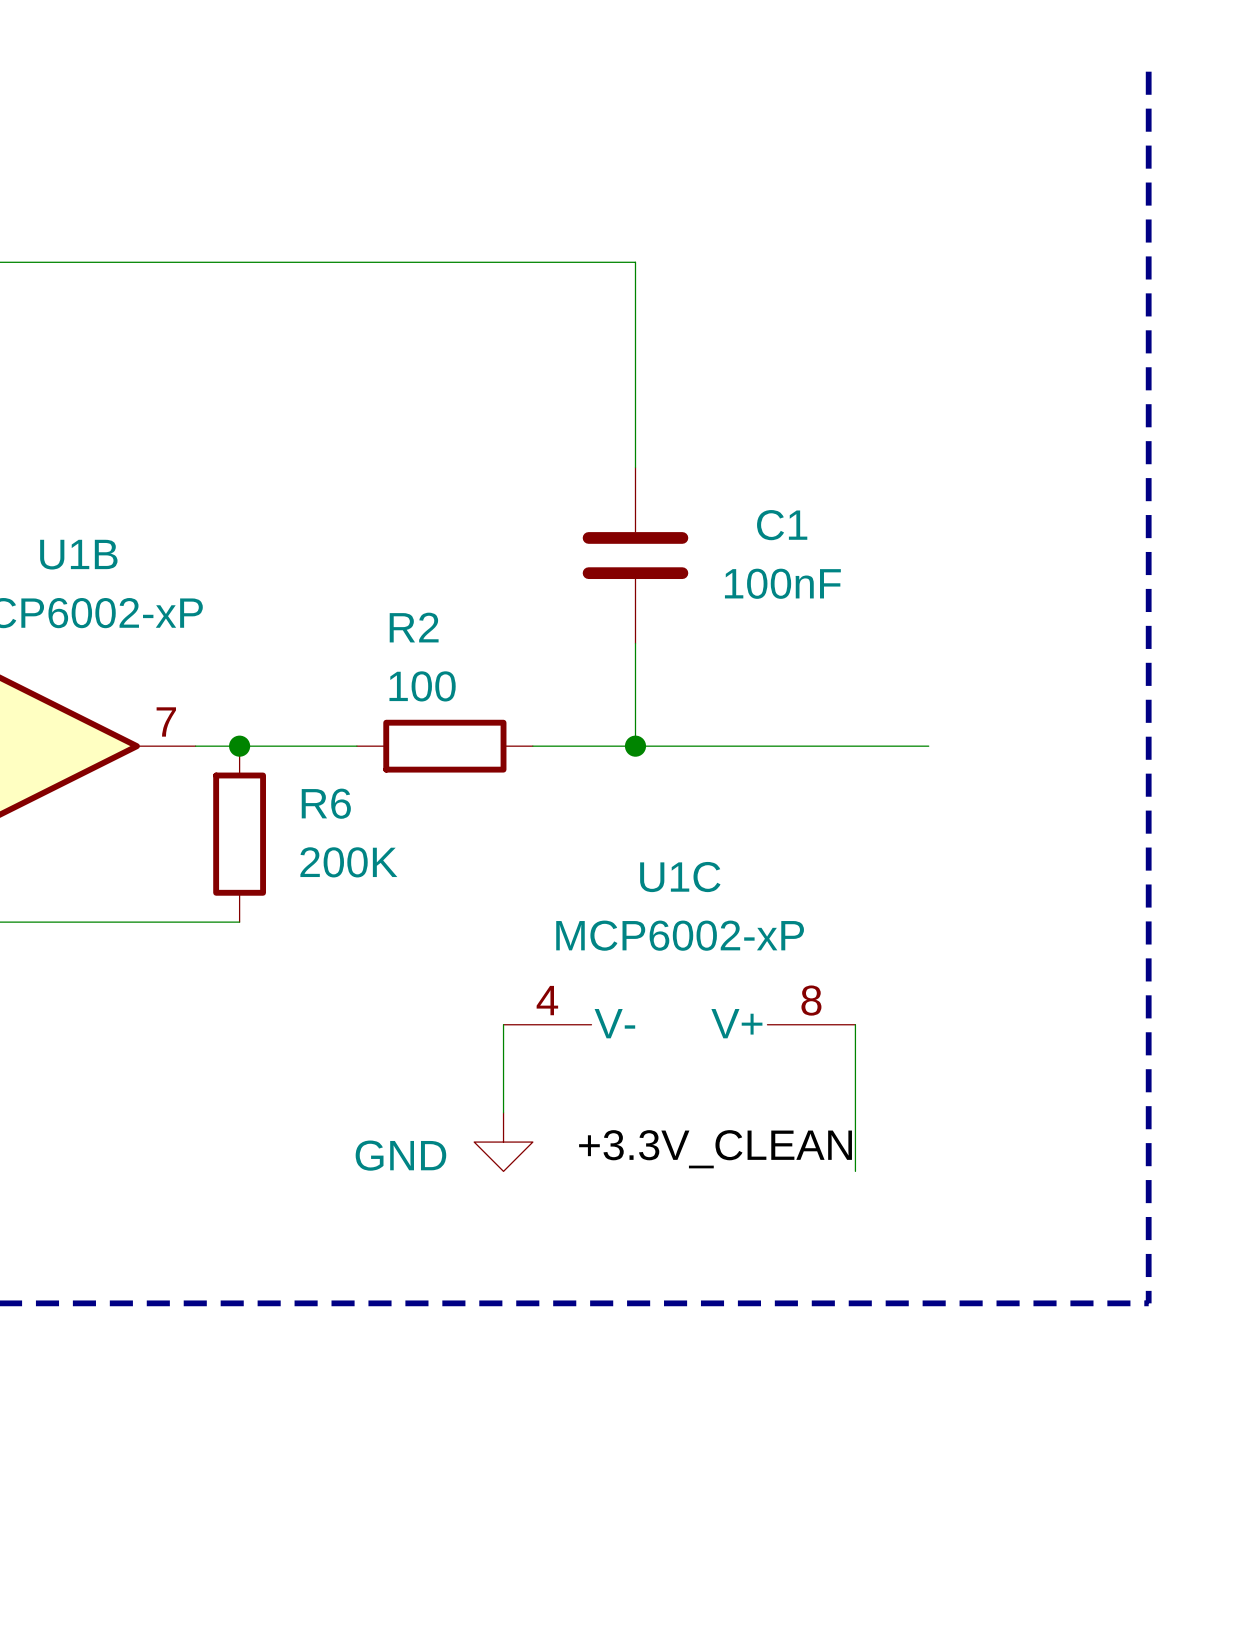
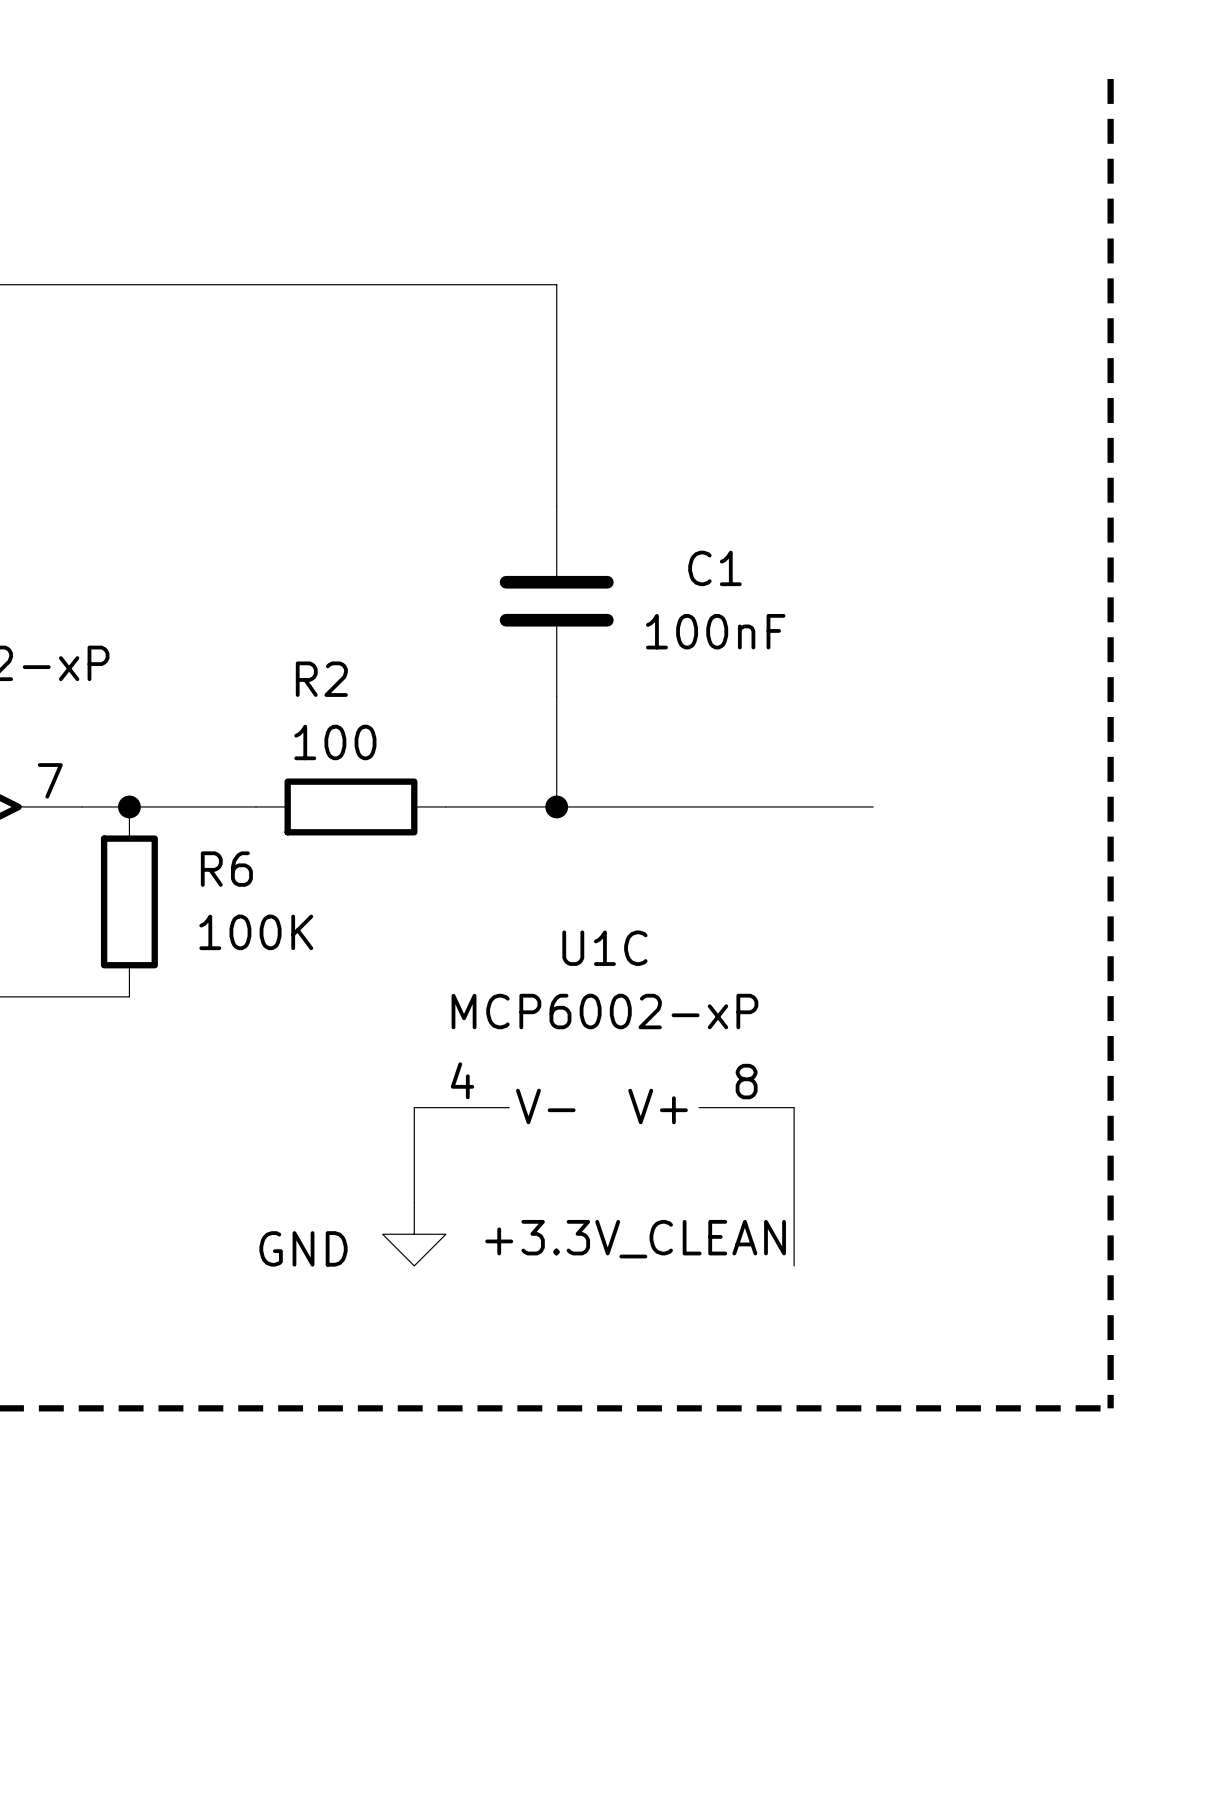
R6 value: 200K (348, 862) -> 100K (256, 932)

